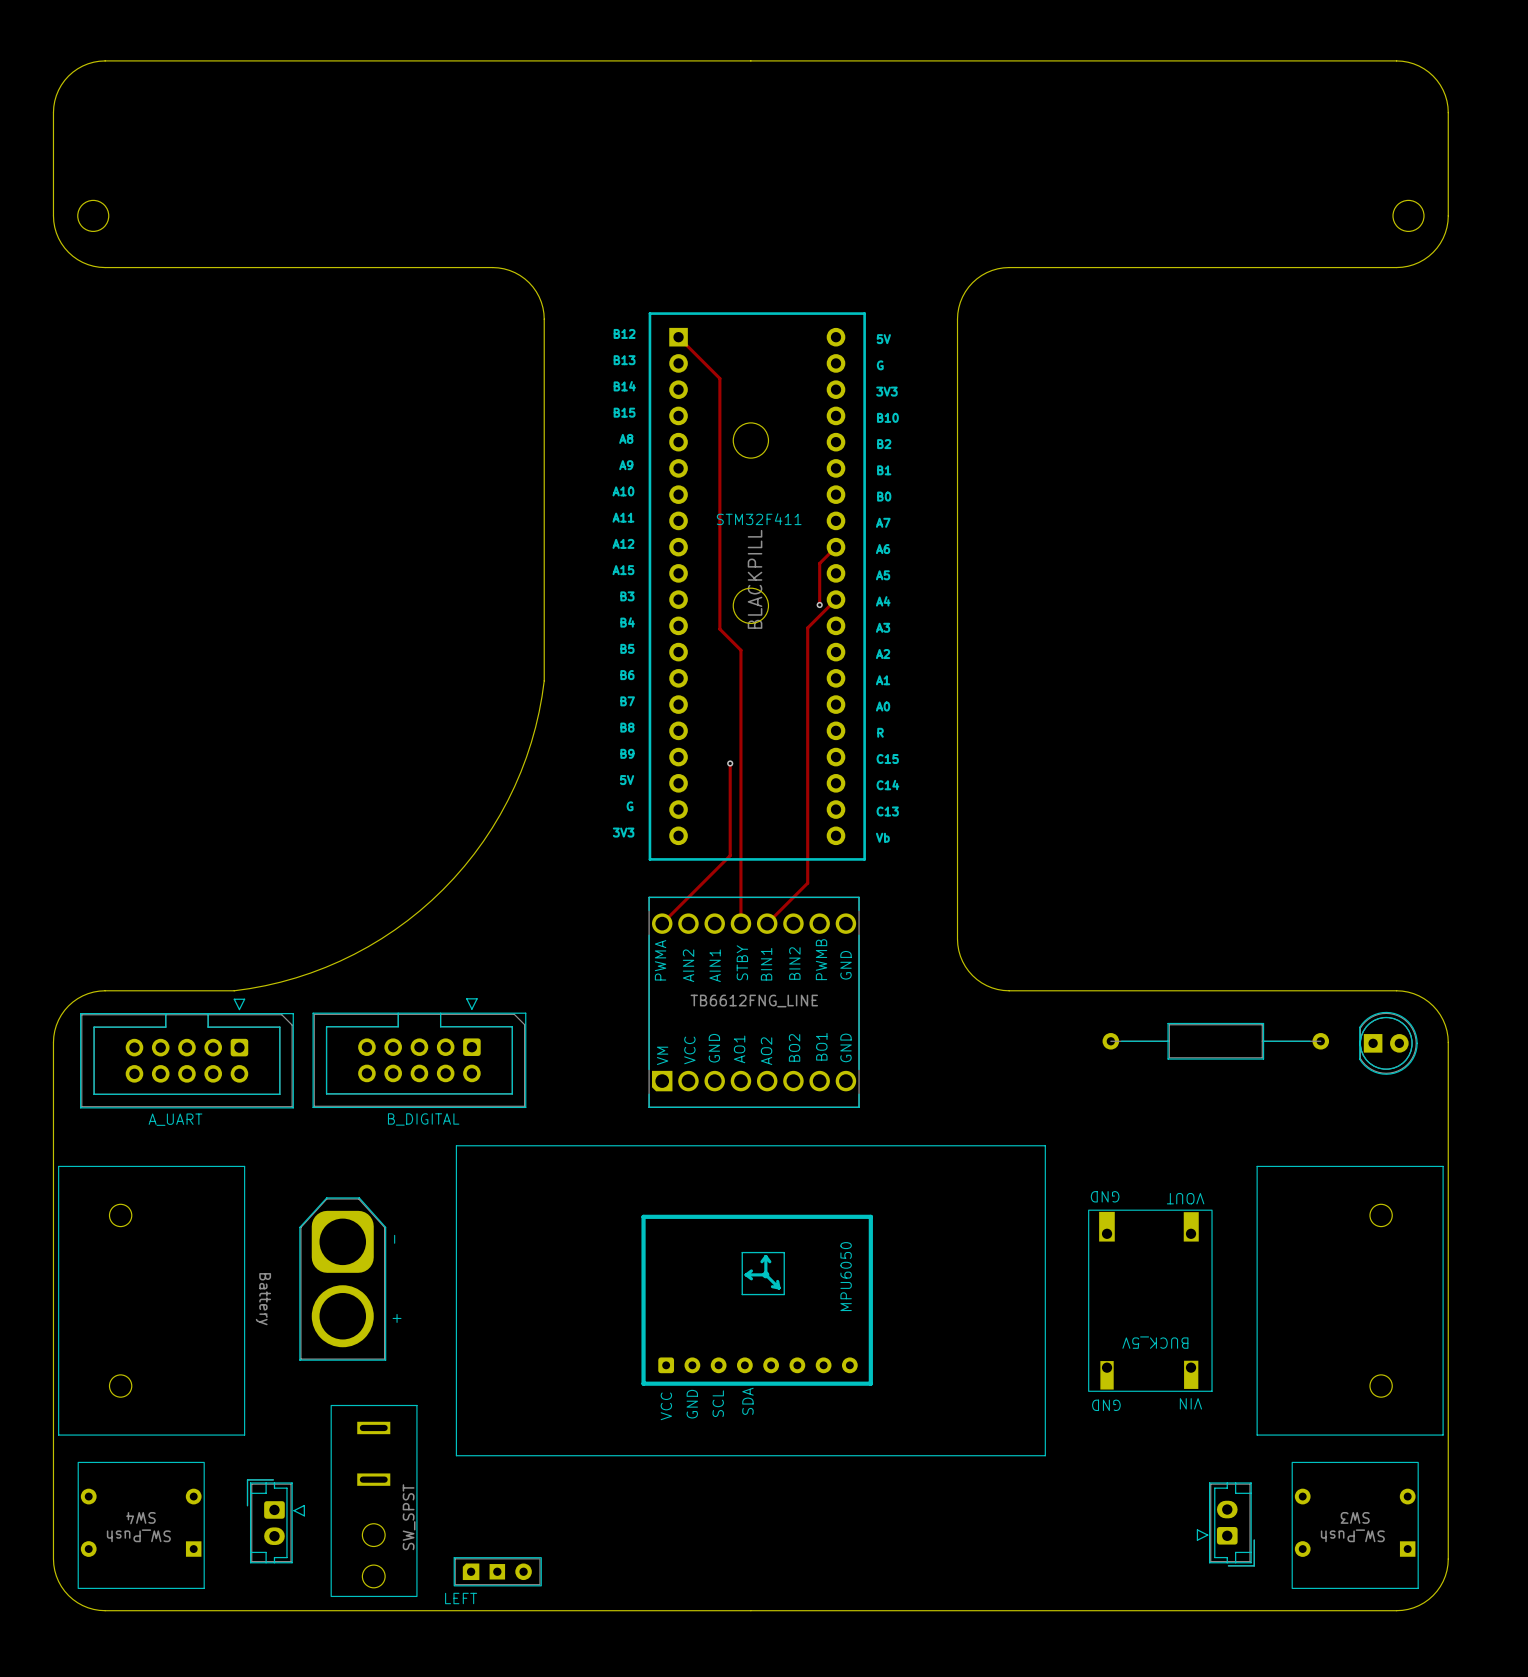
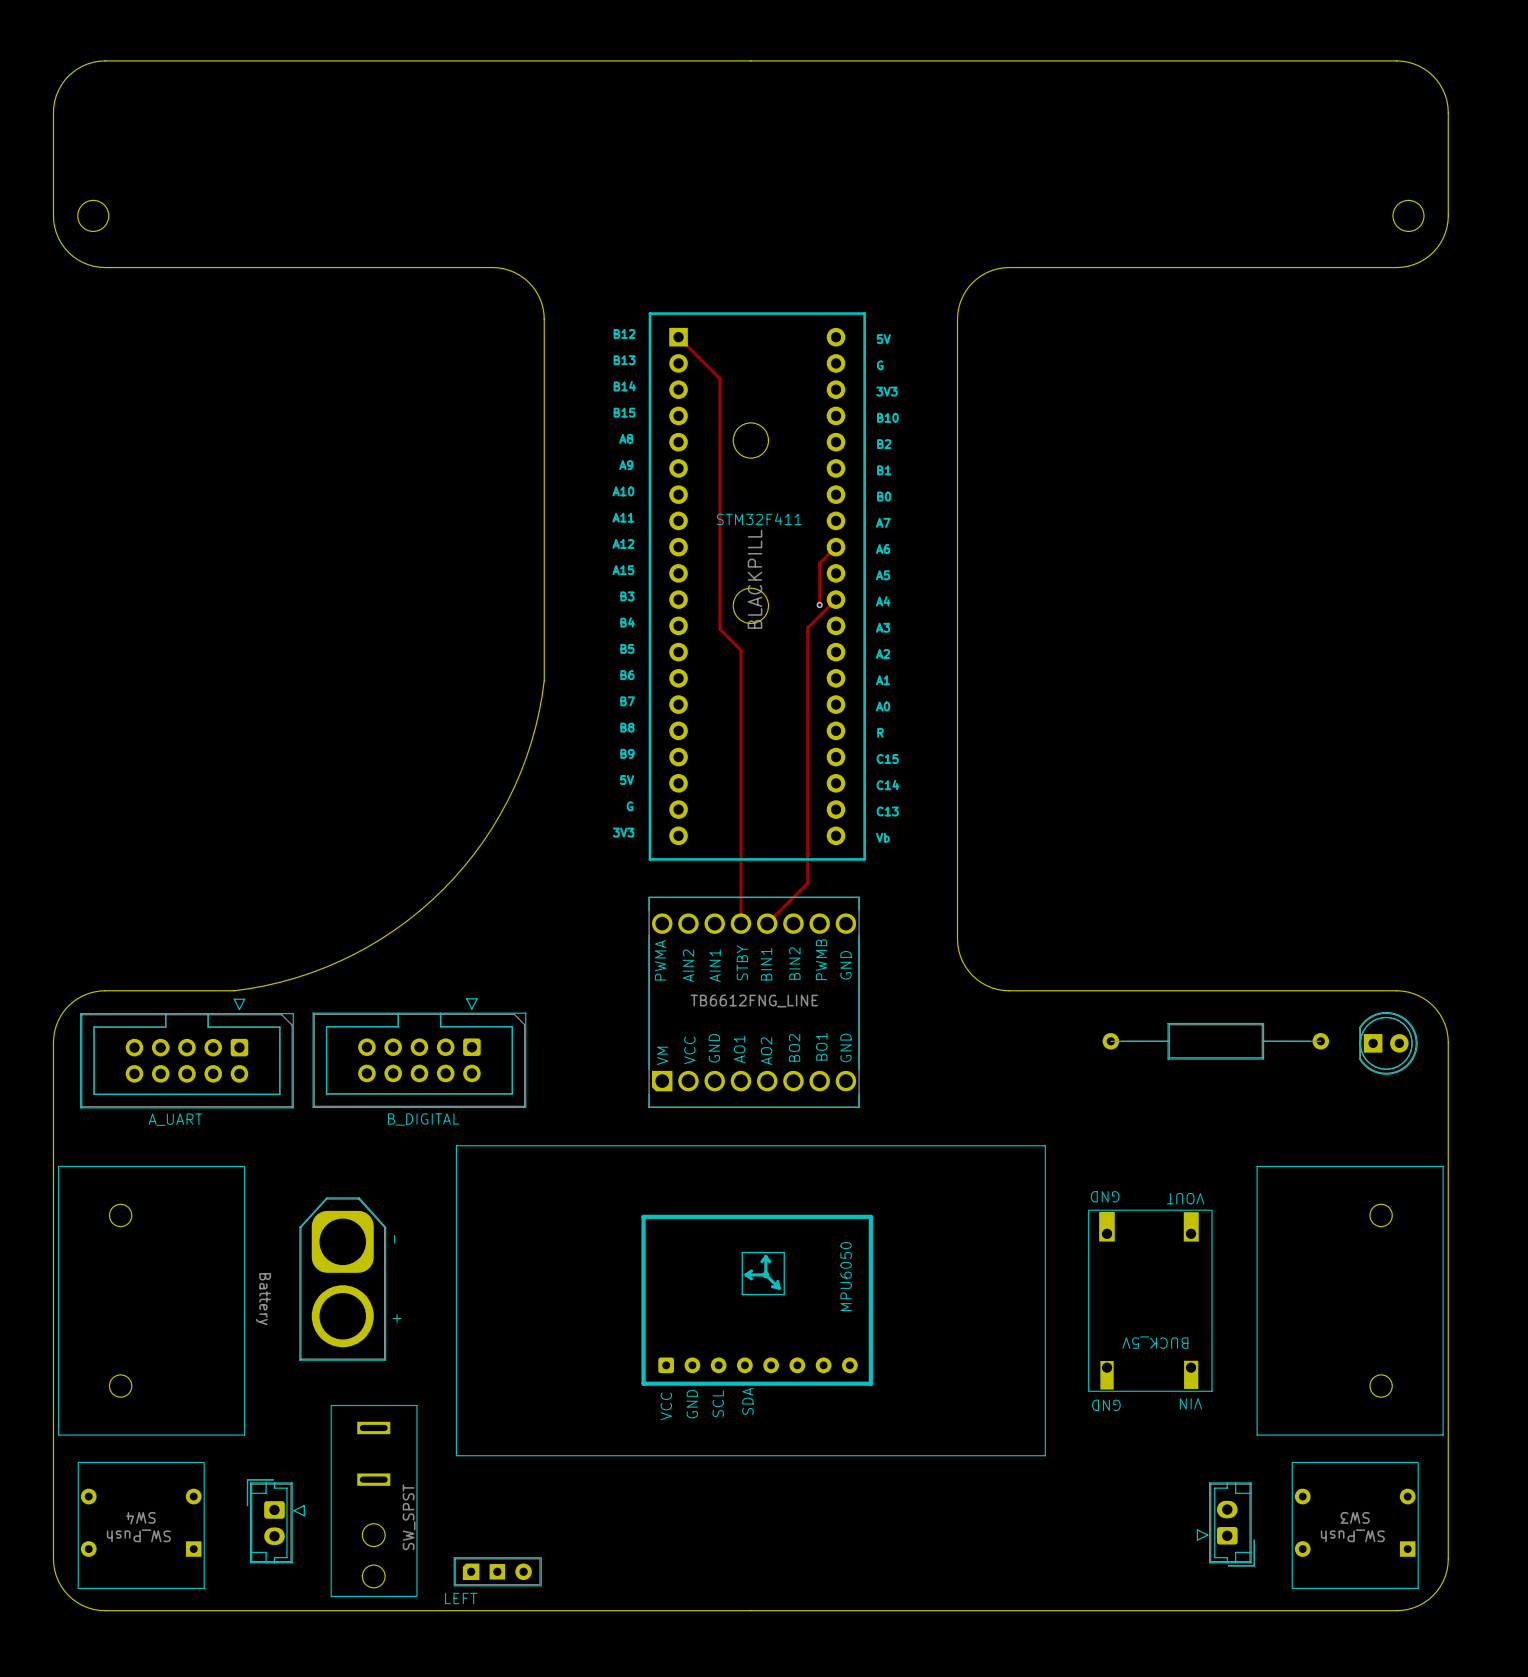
track: (730, 763) (730, 855) (662, 923) -> none
via: (730, 763) -> none

